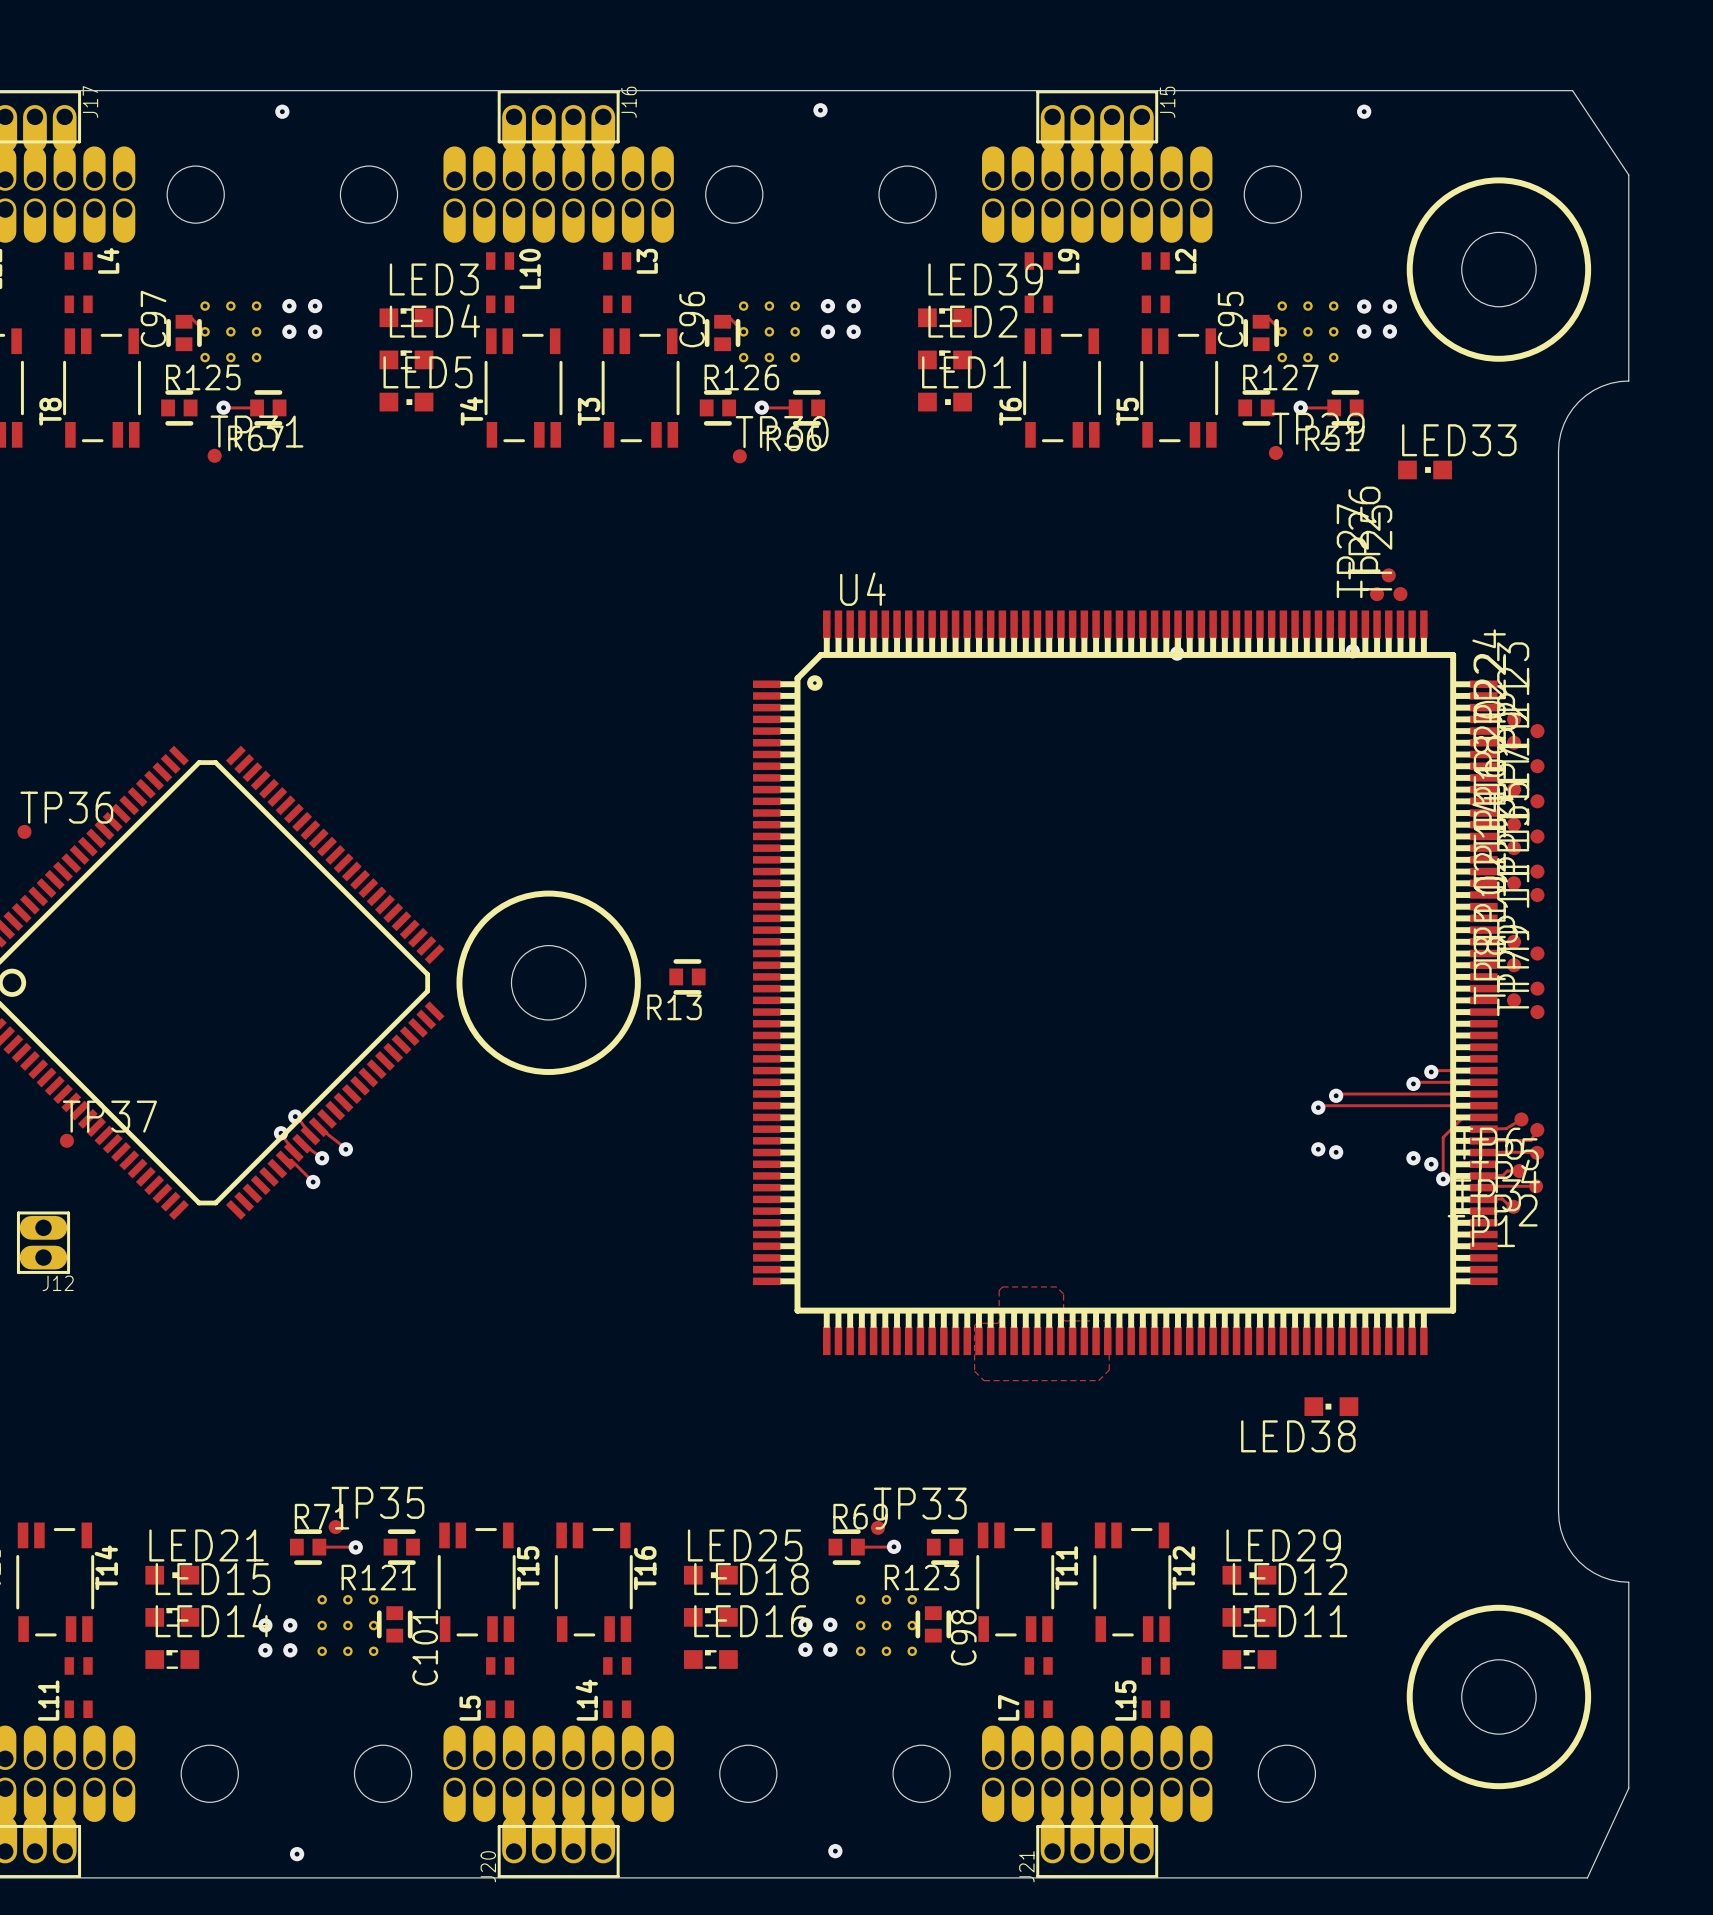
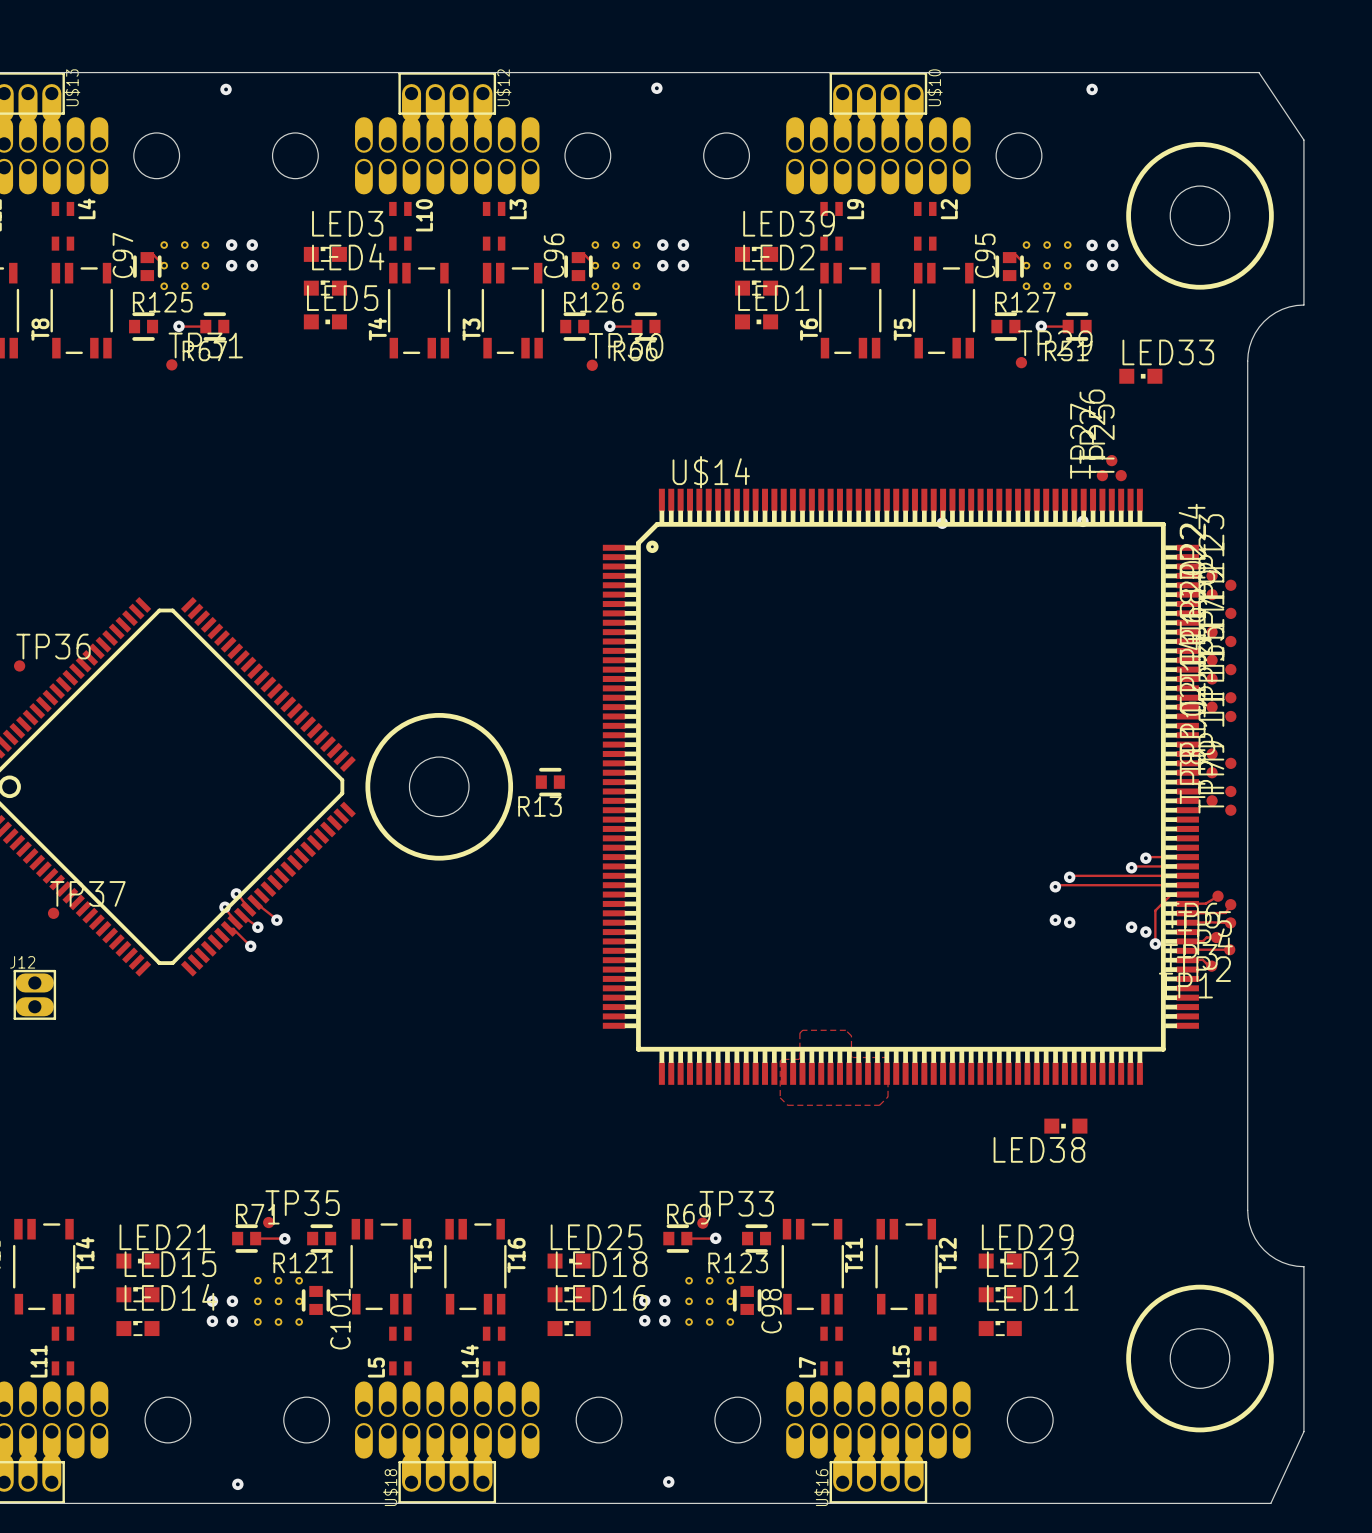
J17 name: J17 (90, 101) -> U$13 (72, 87)
J16 name: J16 (629, 102) -> U$12 (503, 87)
J15 name: J15 (1167, 102) -> U$10 (934, 87)
U4 name: U4 (862, 589) -> U$14 (711, 472)
J12 name position: J12 (58, 1283) -> J12 (22, 962)
J20 name: J20 (488, 1866) -> U$18 (390, 1487)
J21 name: J21 (1026, 1866) -> U$16 (822, 1487)

